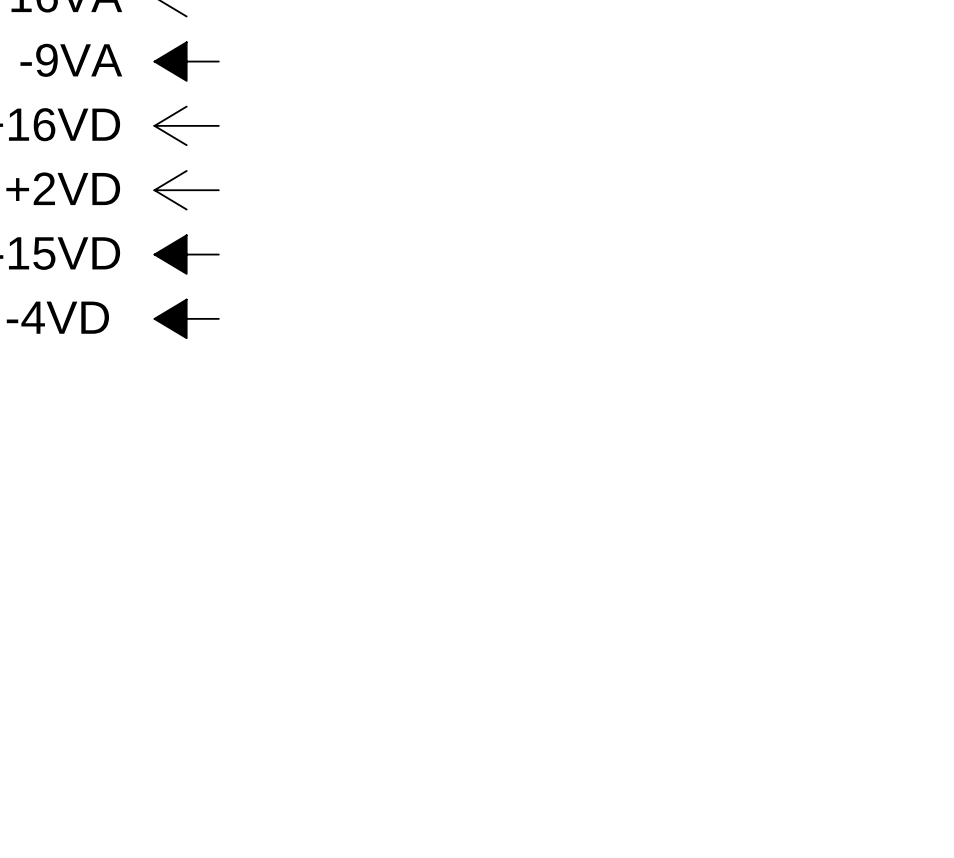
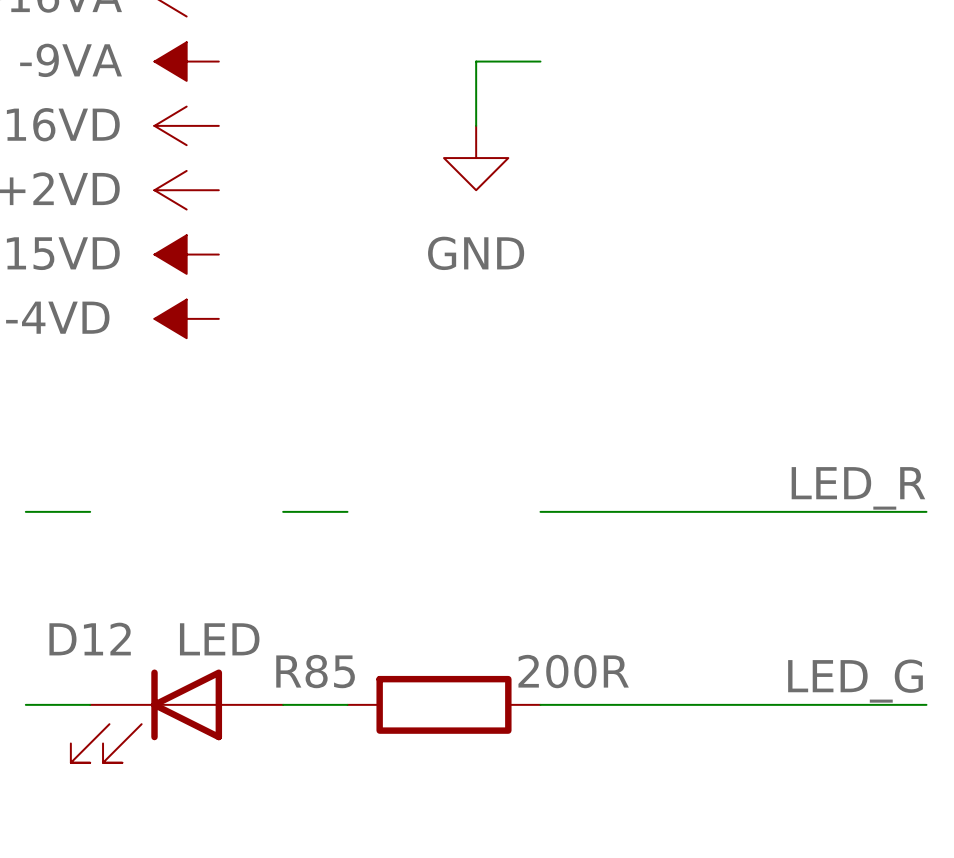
wire: none -> (540, 61) (476, 61) (476, 125)
power symbol: none -> GND (476, 158)
label: none -> LED_R (858, 488)
wire: none -> (25, 511) (90, 511)
wire: none -> (283, 511) (347, 511)
wire: none -> (540, 511) (926, 511)
label: none -> LED_G (855, 681)
wire: none -> (25, 704) (90, 704)
wire: none -> (283, 704) (347, 704)
R85: none -> 200R (443, 704)
wire: none -> (540, 704) (926, 704)
D12: none -> LED (177, 716)

